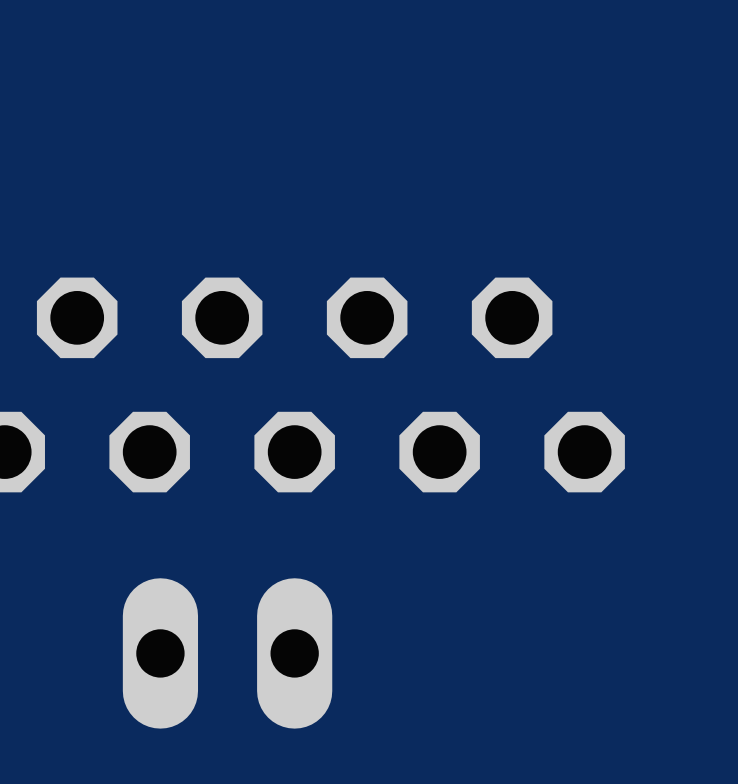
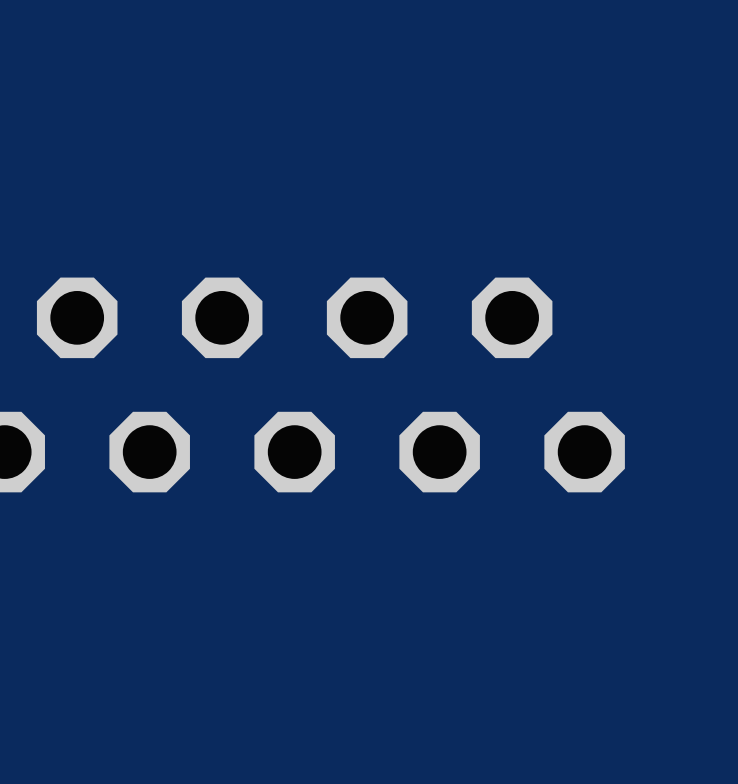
part: (227, 653) -> none

